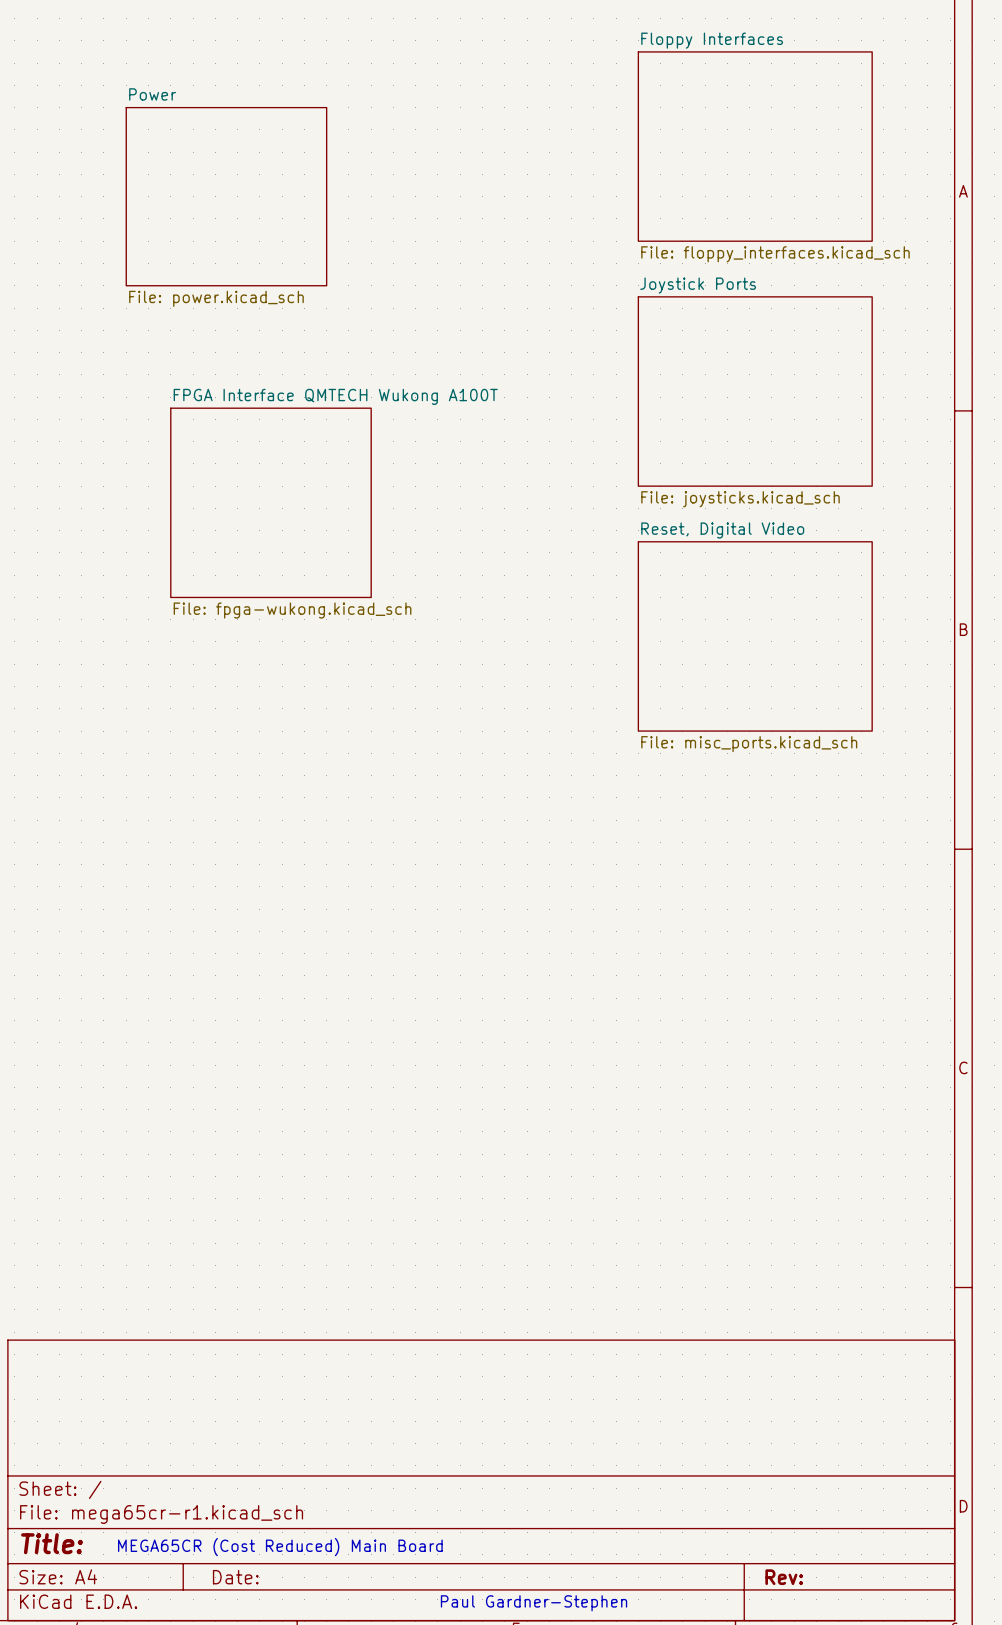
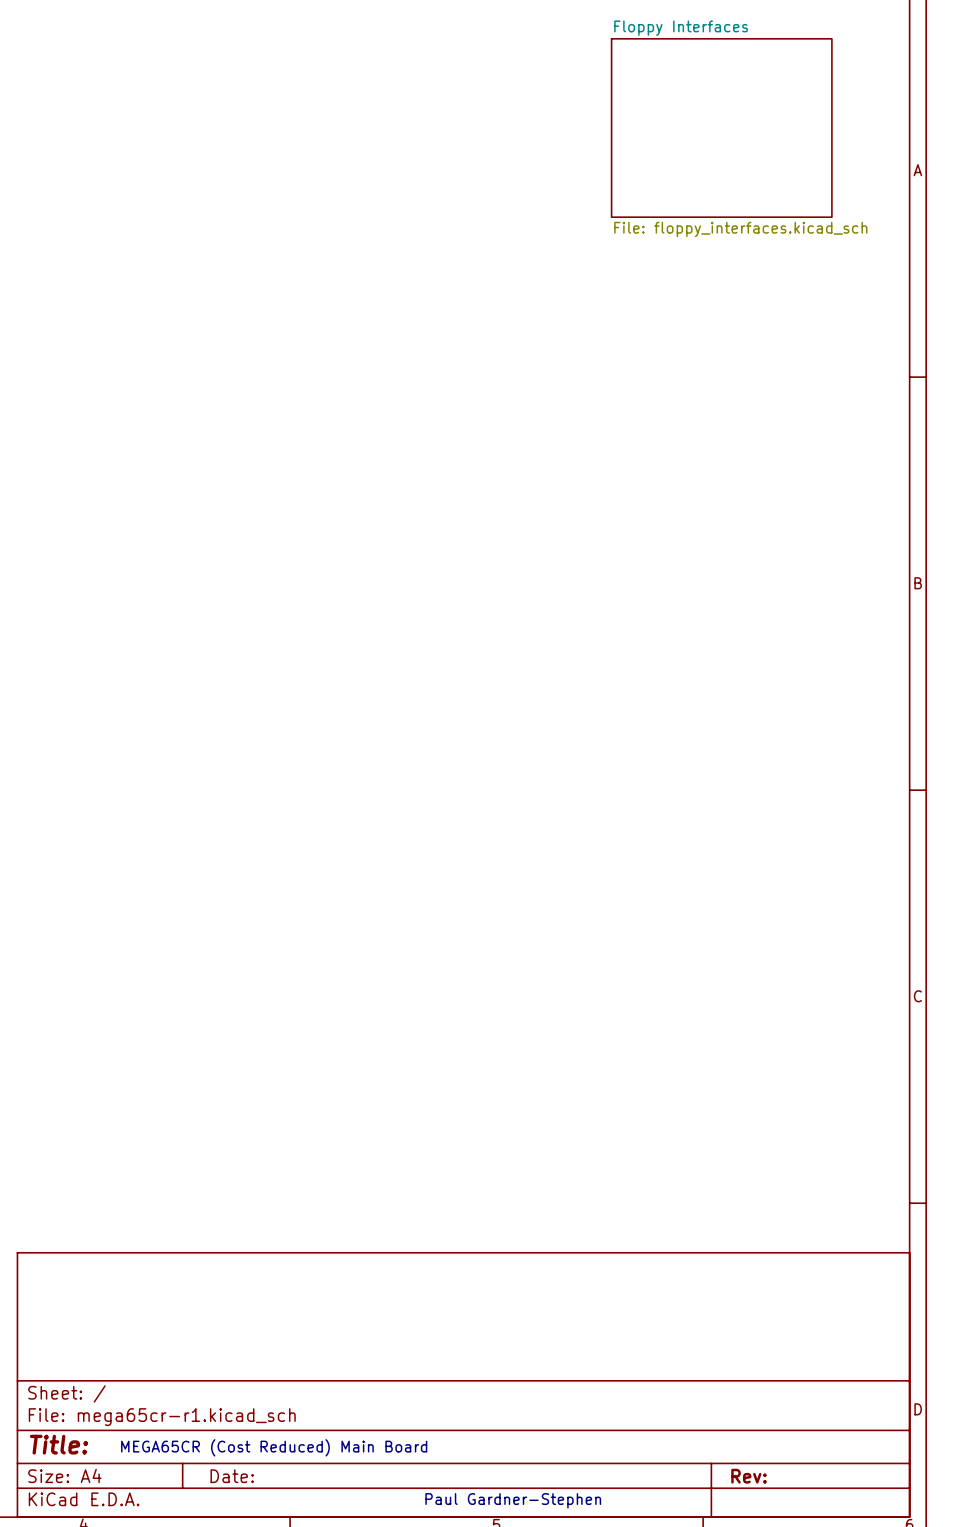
sheet Power: File: power.kicad_sch (226, 196) -> none
sheet Joystick Ports: File: joysticks.kicad_sch (755, 391) -> none
sheet FPGA Interface QMTECH Wukong A100T: File: fpga-wukong.kicad_sch (270, 502) -> none
sheet Reset, Digital Video: File: misc_ports.kicad_sch (755, 636) -> none

